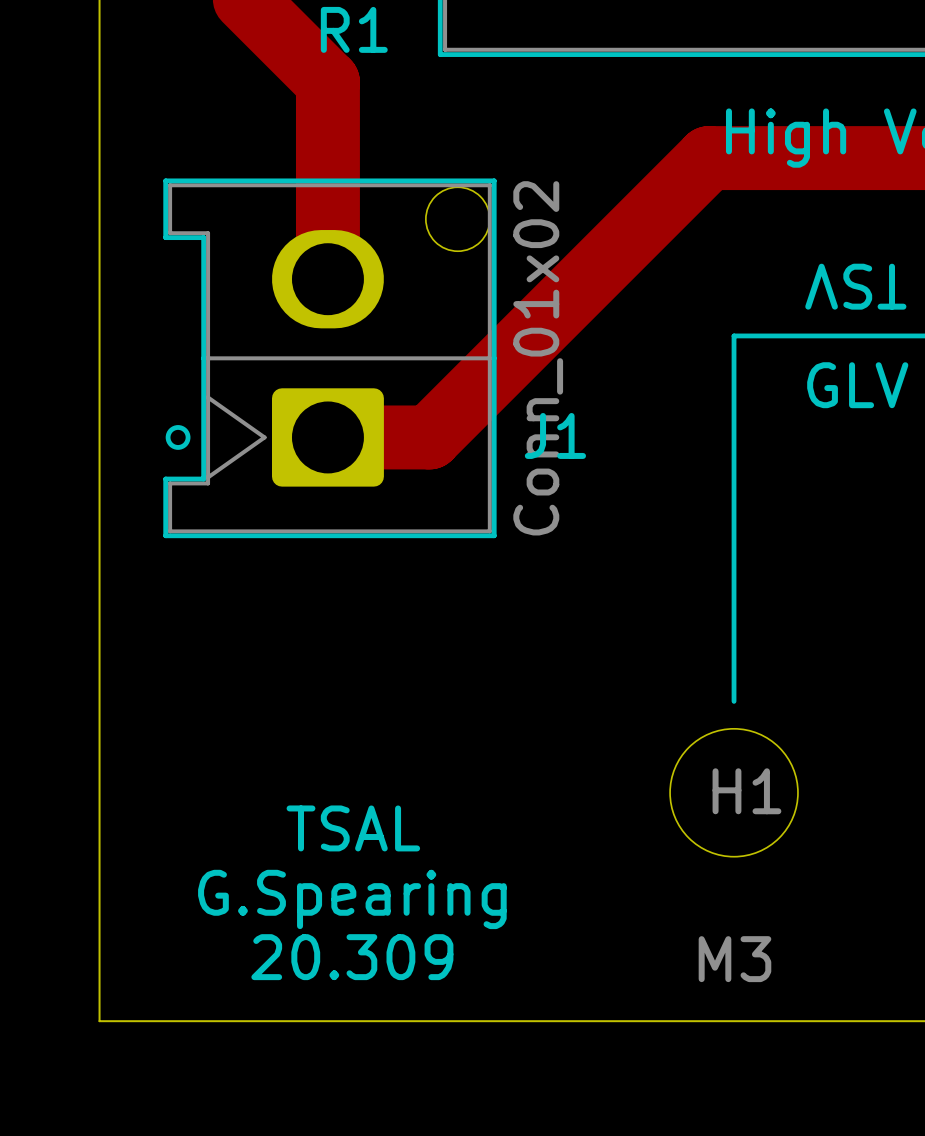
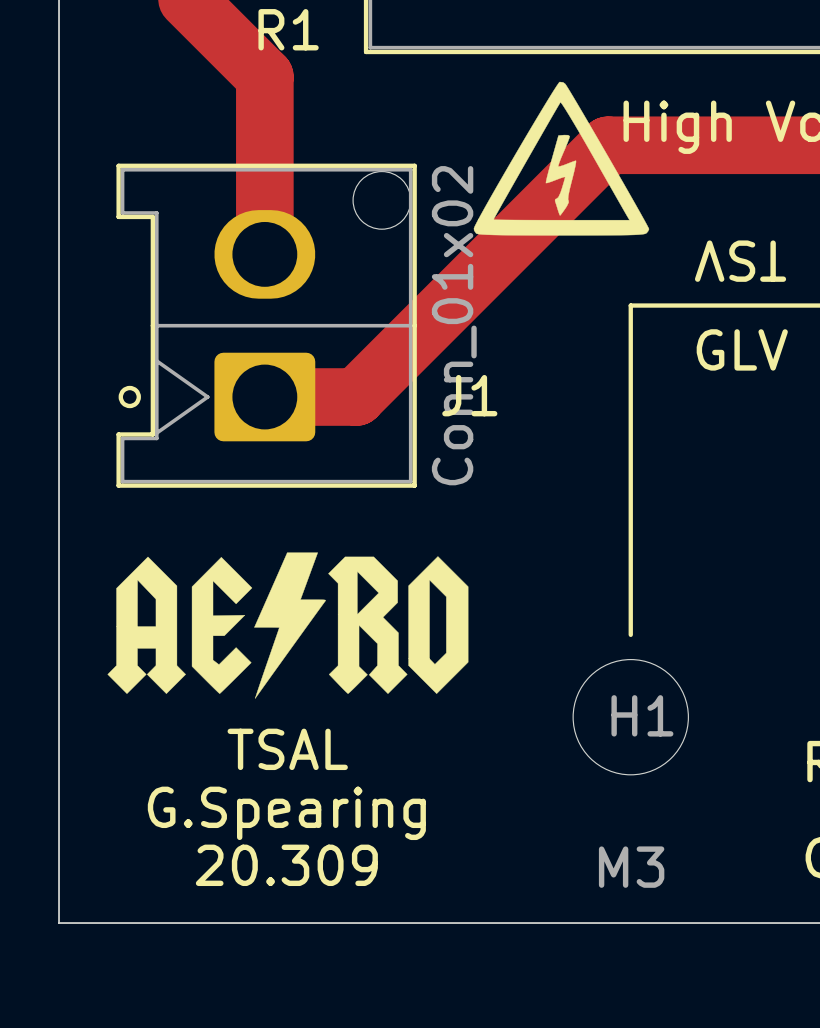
drawing: none -> [473, 81, 650, 236]
drawing: none -> [107, 552, 469, 699]

